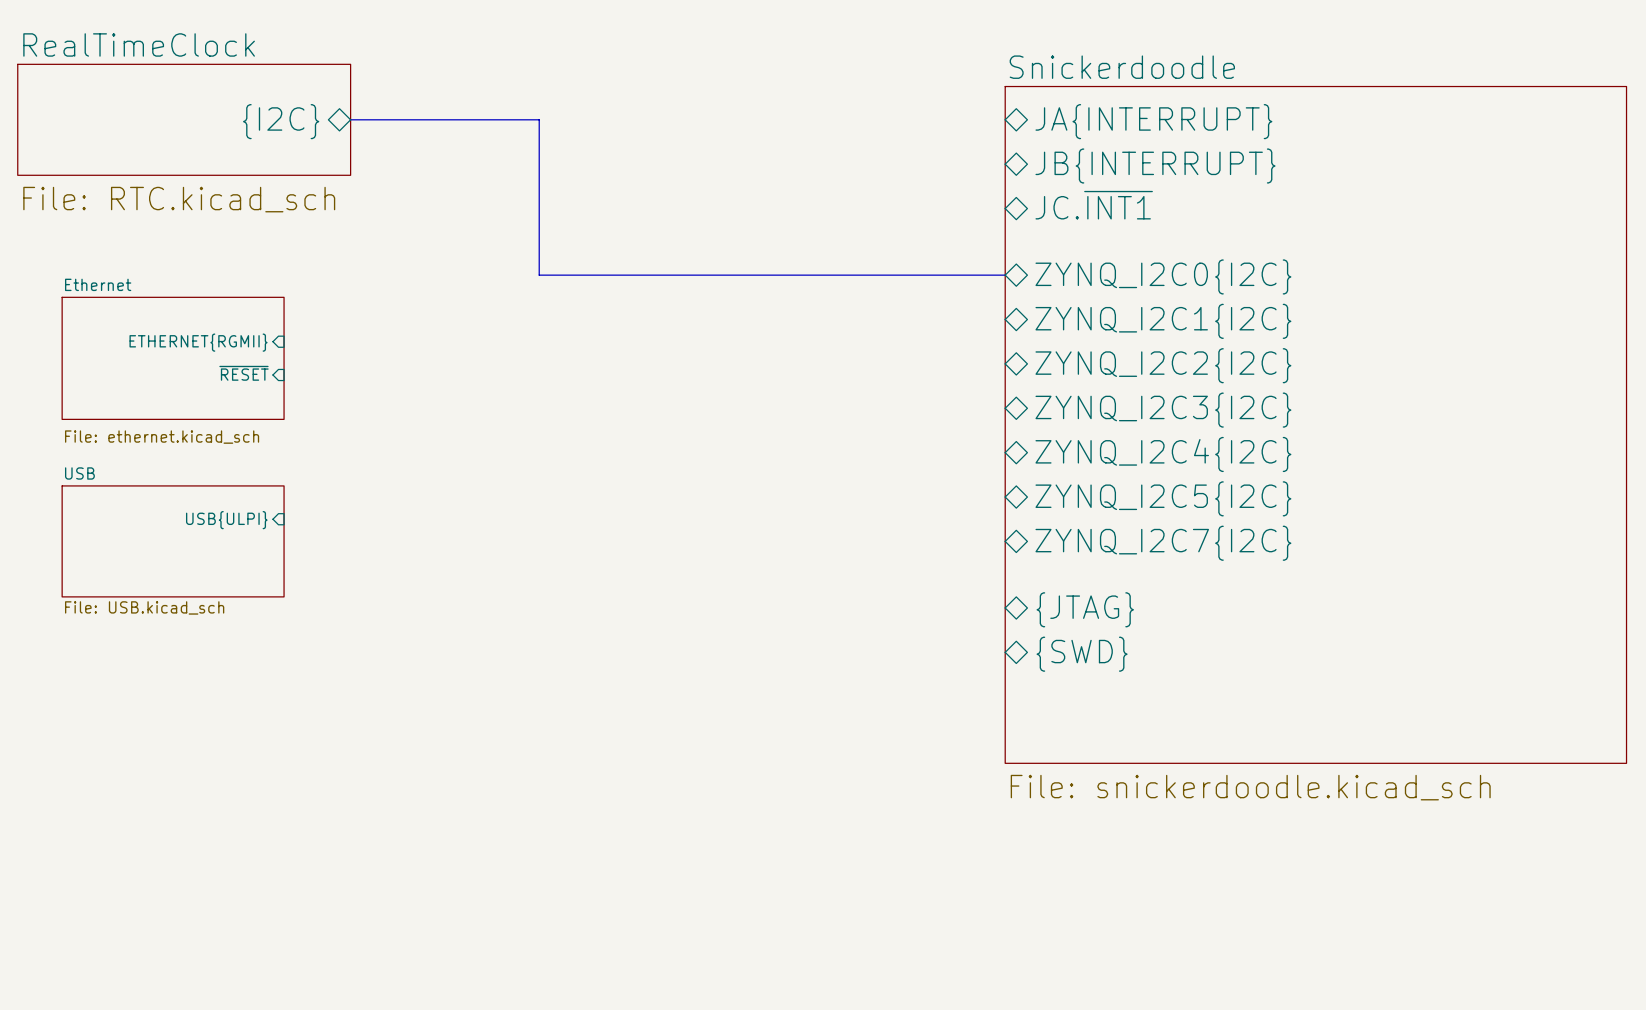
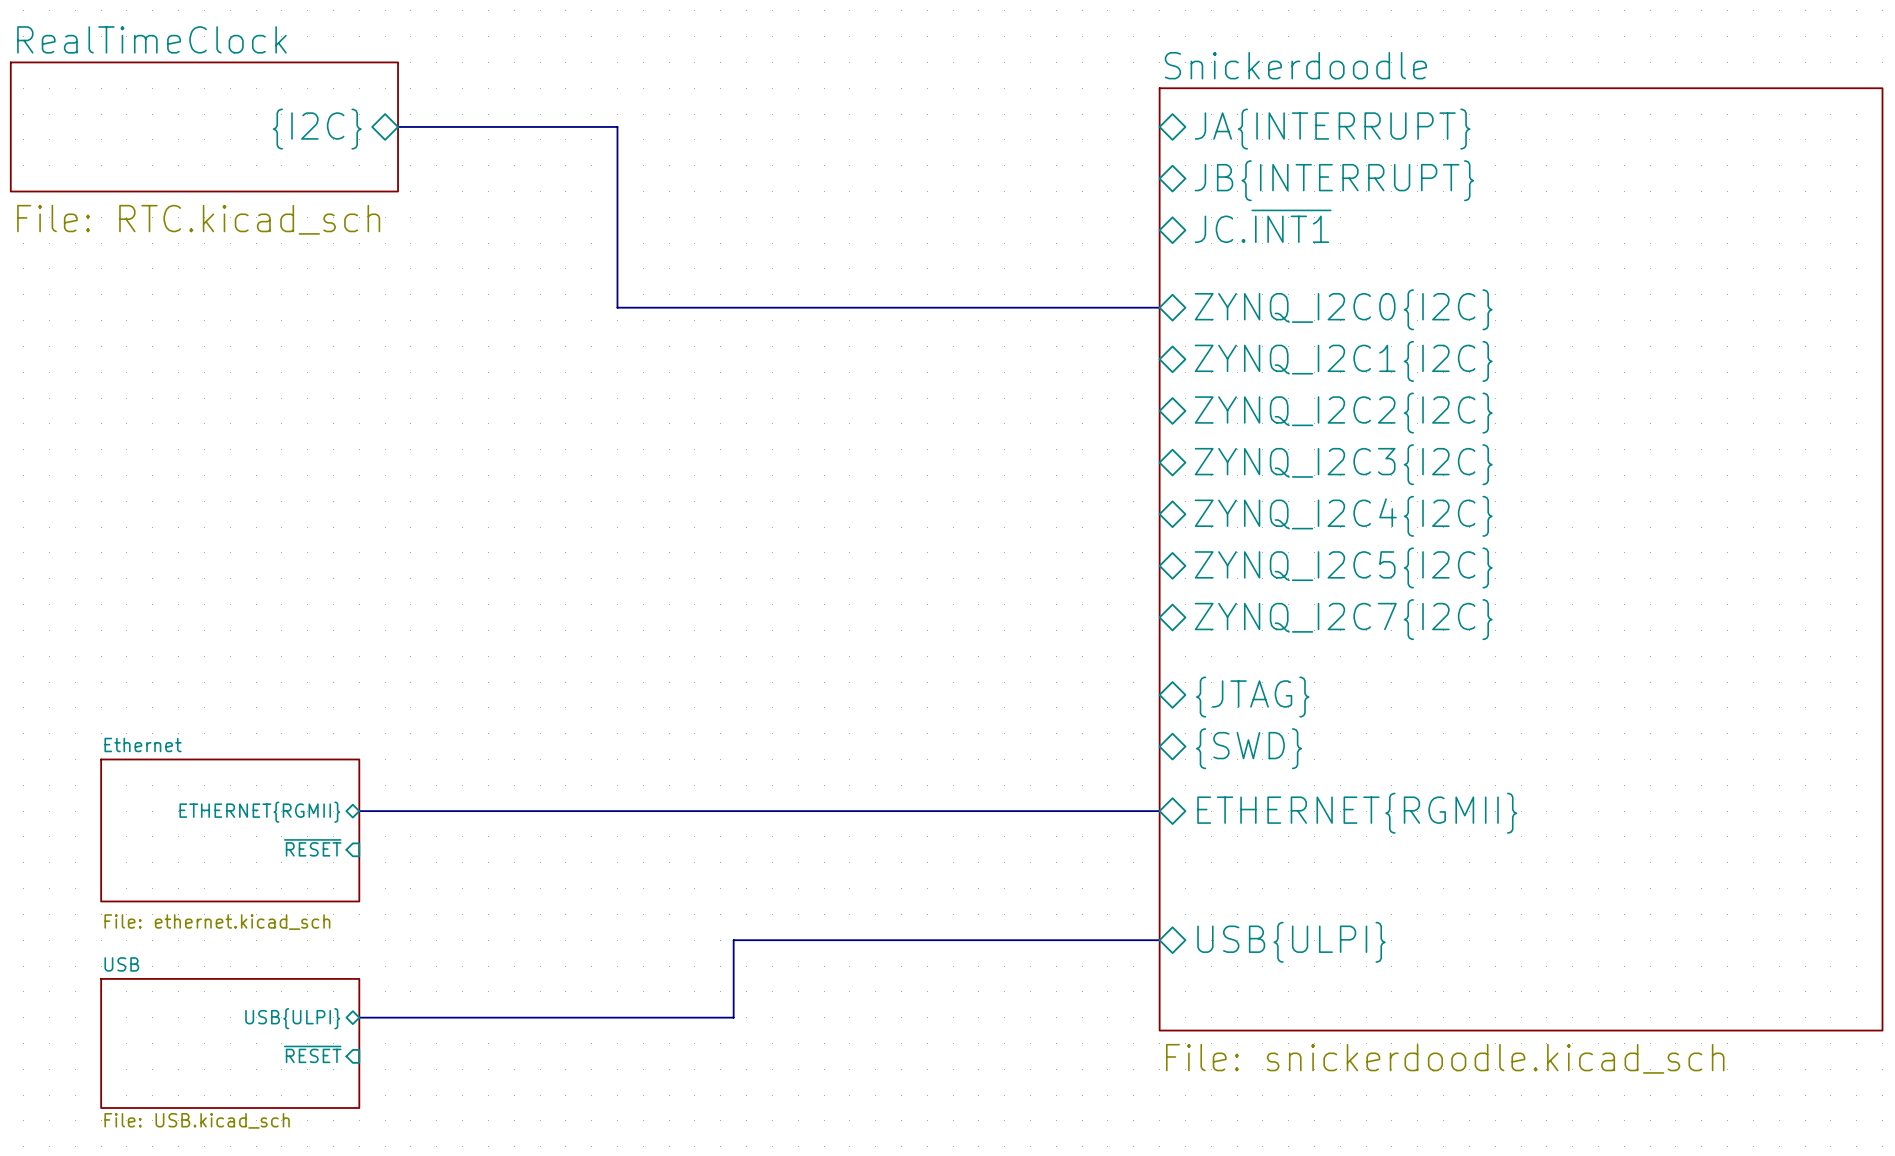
sheet pin: ETHERNET{RGMII} (198, 342) -> none
sheet Ethernet: File: ethernet.kicad_sch (173, 358) -> none
sheet pin: ~{RESET} (244, 373) -> none
sheet Snickerdoodle: File: snickerdoodle.kicad_sch (1315, 424) -> none
sheet Snickerdoodle: none -> File: snickerdoodle.kicad_sch (1521, 559)
sheet pin: USB{ULPI} (226, 520) -> none
sheet USB: File: USB.kicad_sch (173, 541) -> none
bus: none -> (359, 811) (1159, 811)
sheet pin: none -> ETHERNET{RGMII} (259, 812)
sheet pin: none -> ETHERNET{RGMII} (1357, 813)
sheet Ethernet: none -> File: ethernet.kicad_sch (230, 830)
sheet pin: none -> ~{RESET} (312, 847)
bus: none -> (1159, 940) (733, 940) (733, 1017) (359, 1017)
sheet pin: none -> USB{ULPI} (1291, 942)
sheet pin: none -> USB{ULPI} (292, 1018)
sheet USB: none -> File: USB.kicad_sch (230, 1043)
sheet pin: none -> ~{RESET} (312, 1054)

